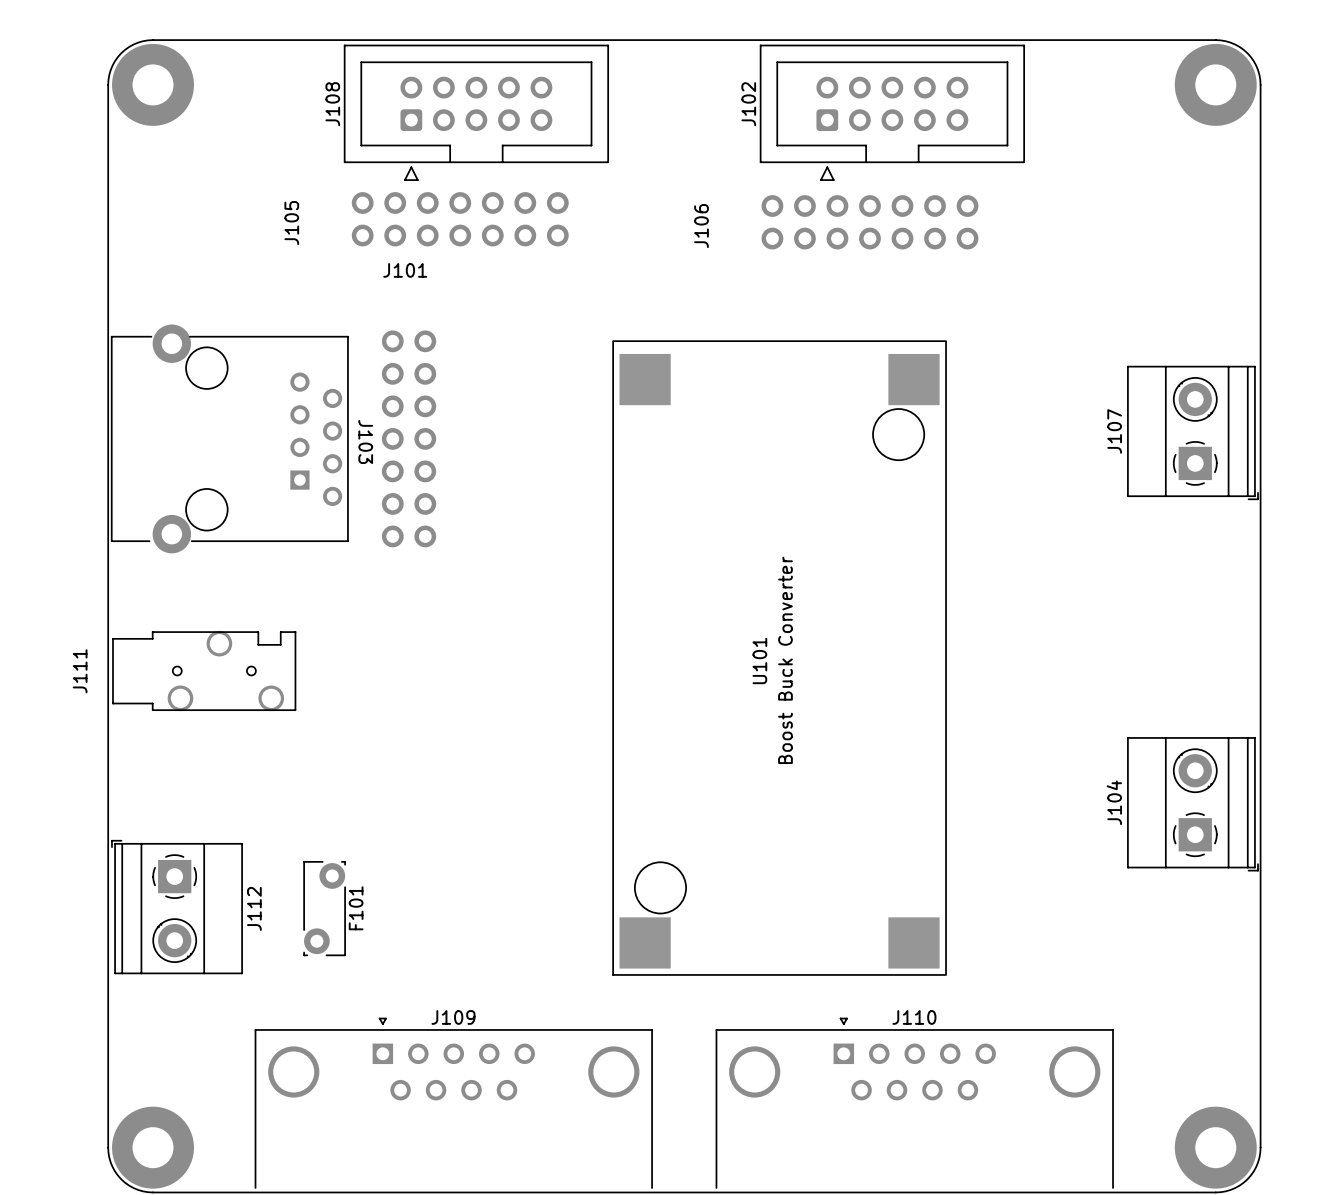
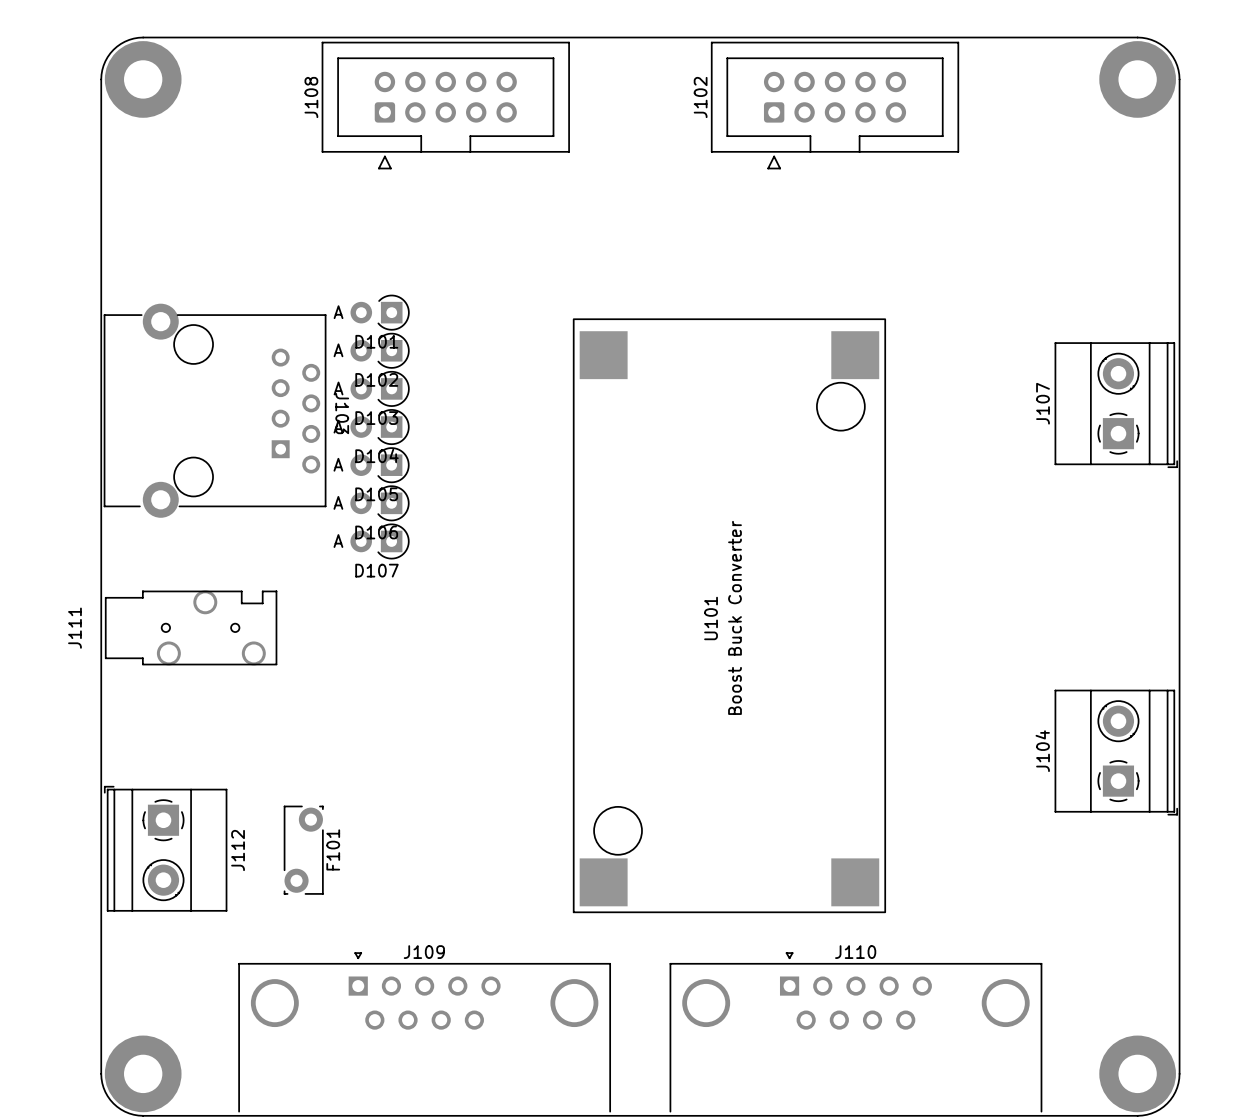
J105: (460, 219) -> none
J106: (869, 222) -> none
D101: none -> (380, 312)
D102: none -> (380, 350)
D103: none -> (380, 388)
J101: (409, 438) -> none
D104: none -> (379, 427)
D105: none -> (379, 465)
D106: none -> (379, 503)
D107: none -> (379, 541)

